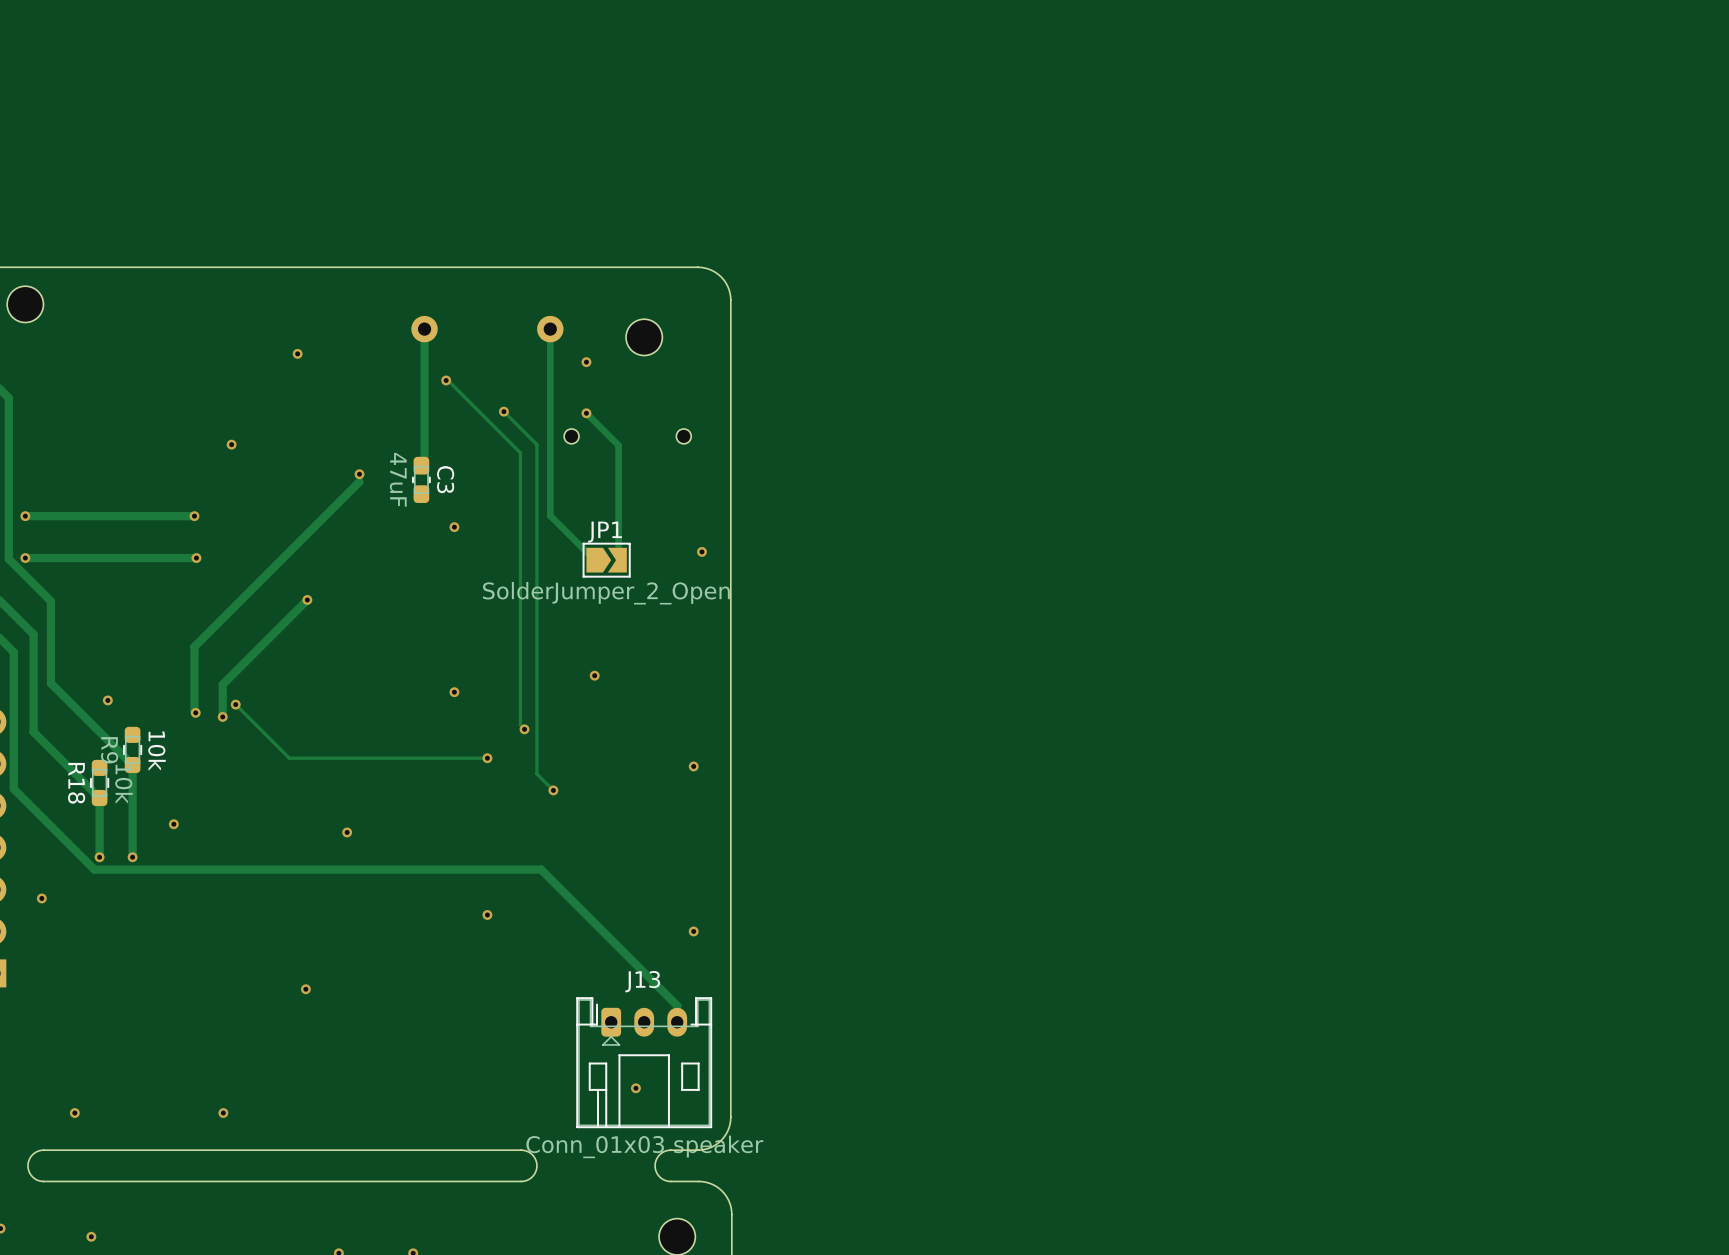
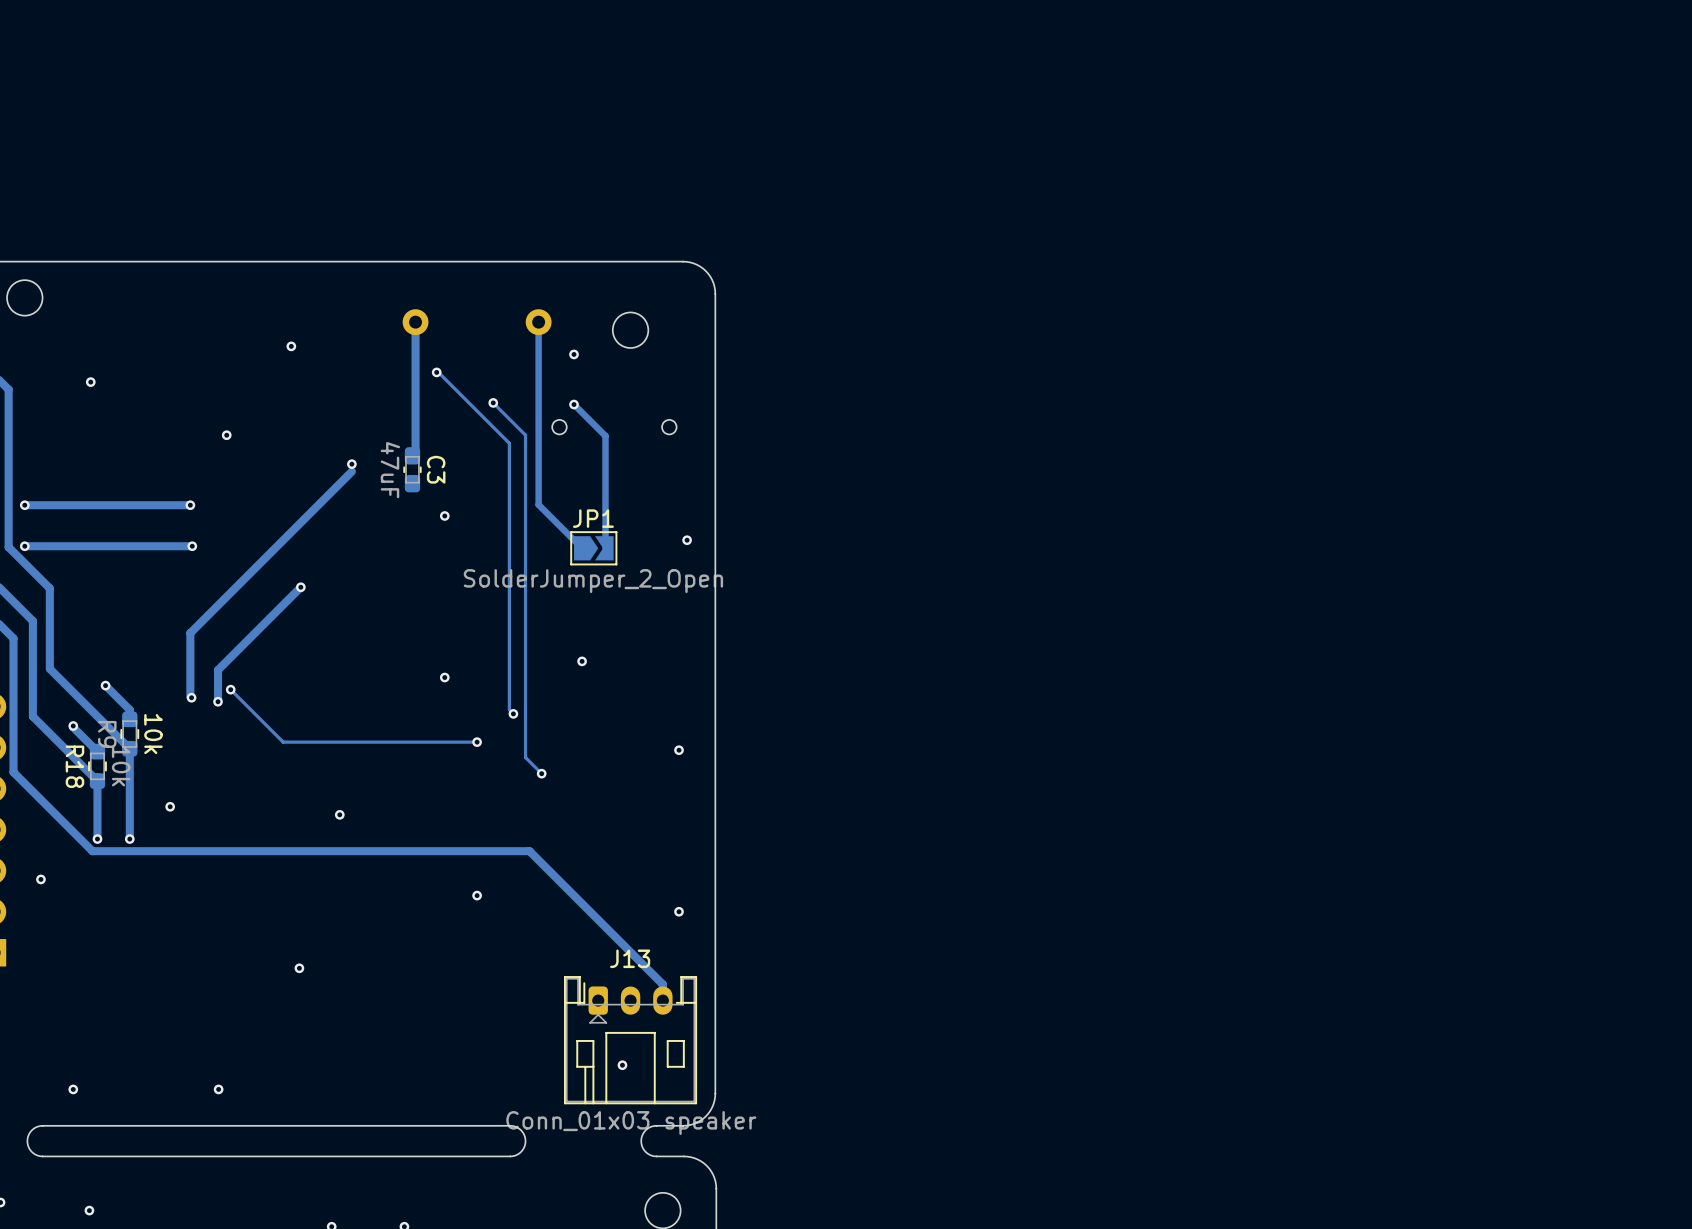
via: none -> (90, 382)
track: none -> (105, 685) (129, 709) (129, 719)
track: none -> (73, 725) (97, 751)
via: none -> (73, 725)

